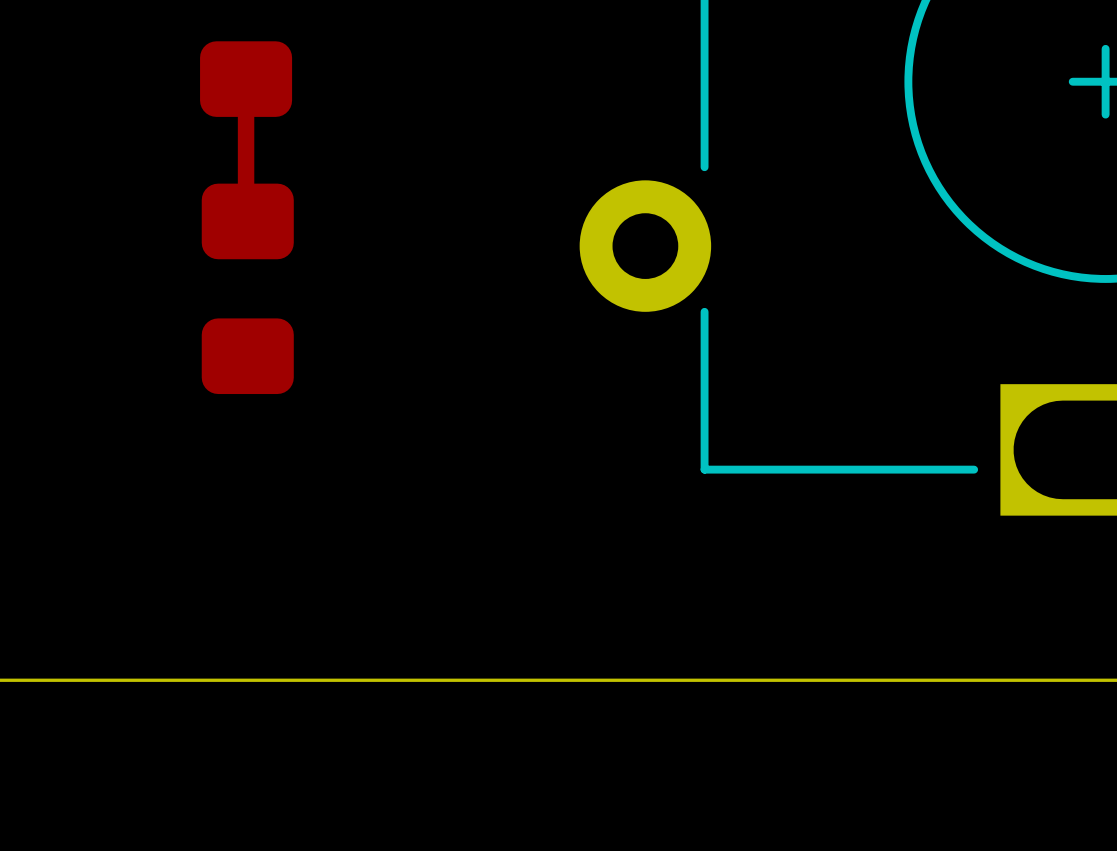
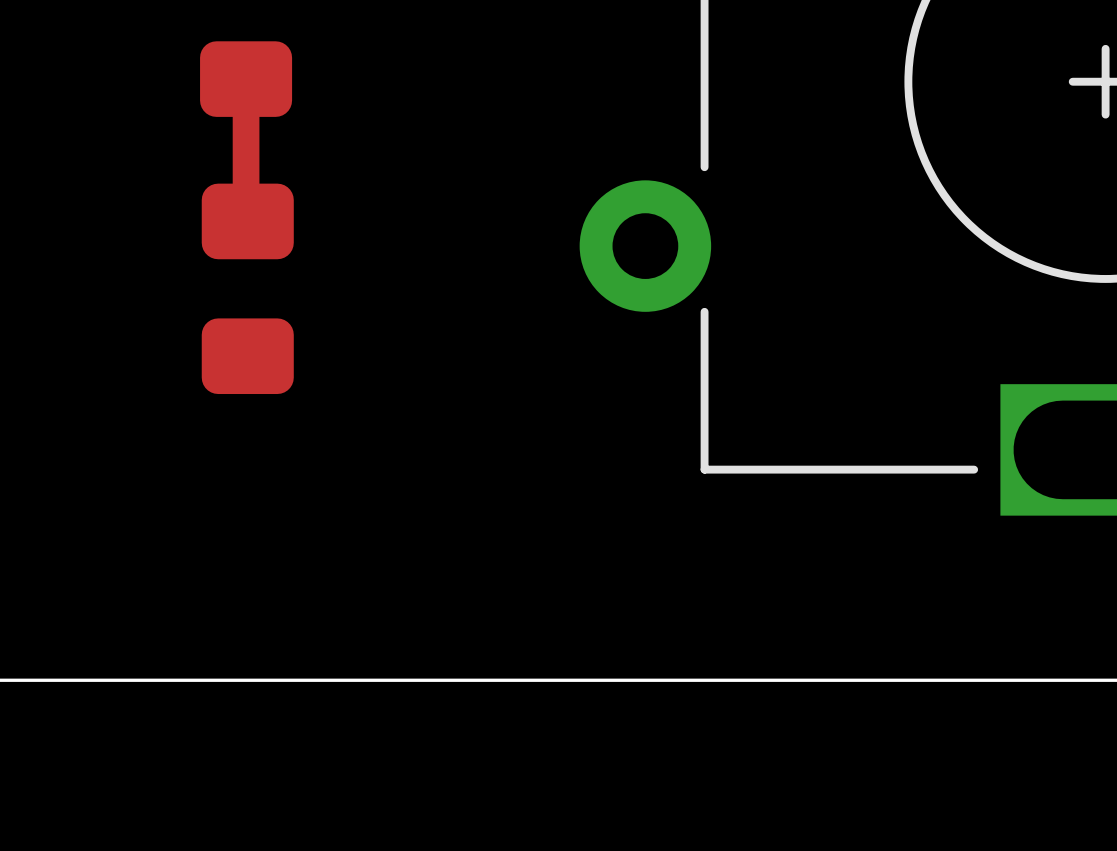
top track width: thin (246, 79) (246, 219) (247, 221) -> thick (246, 79) (246, 219) (247, 221)

